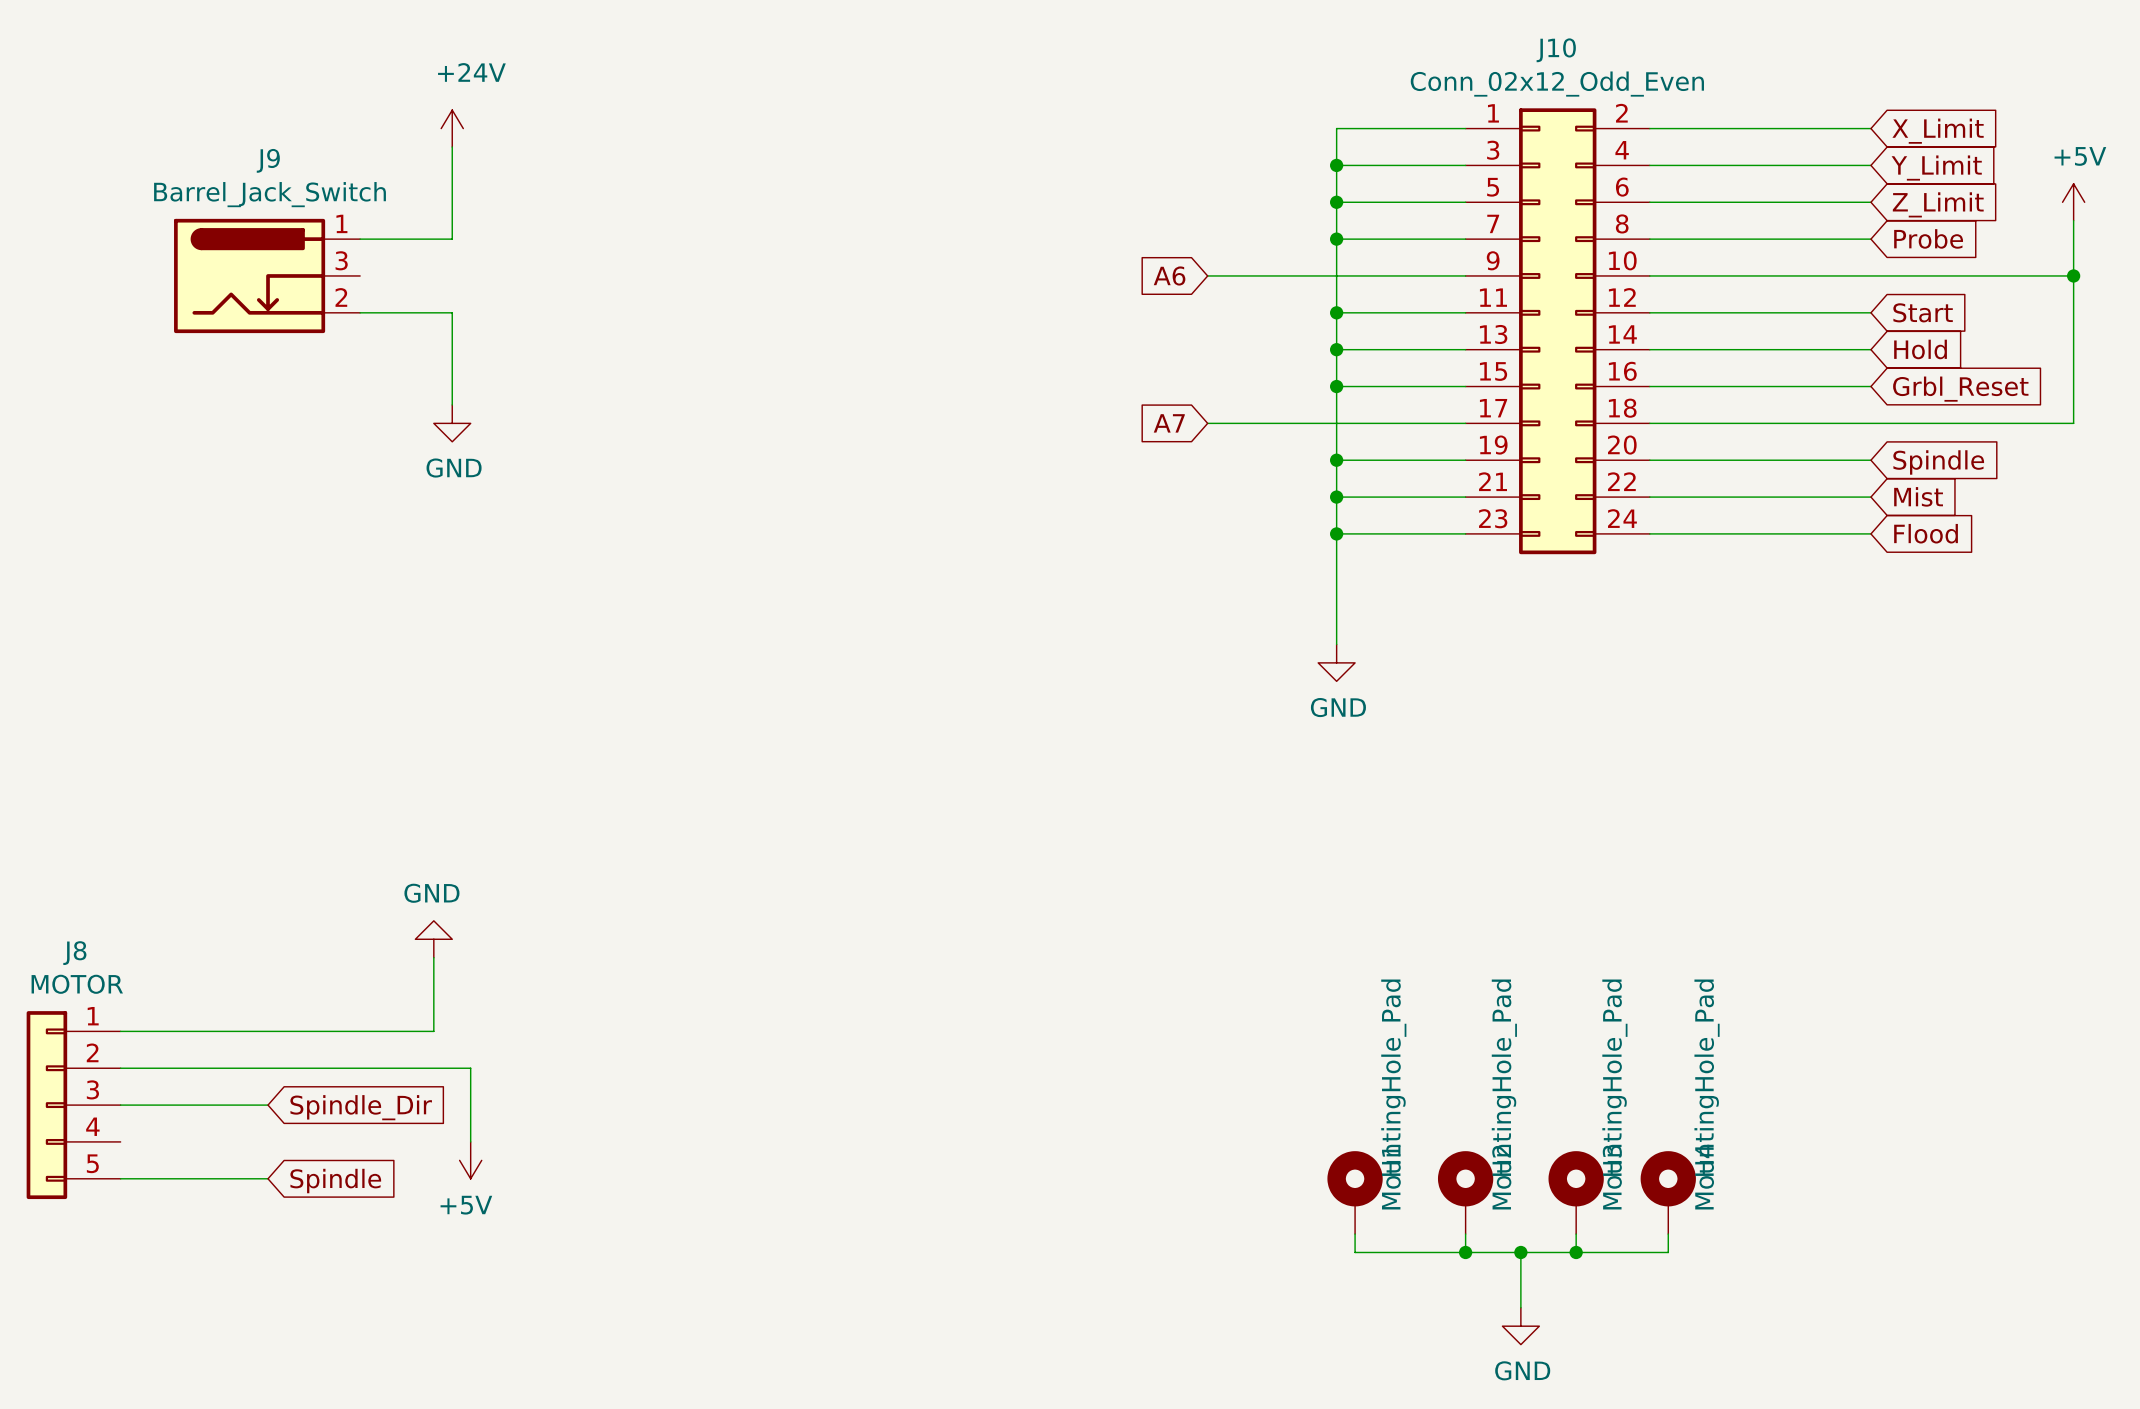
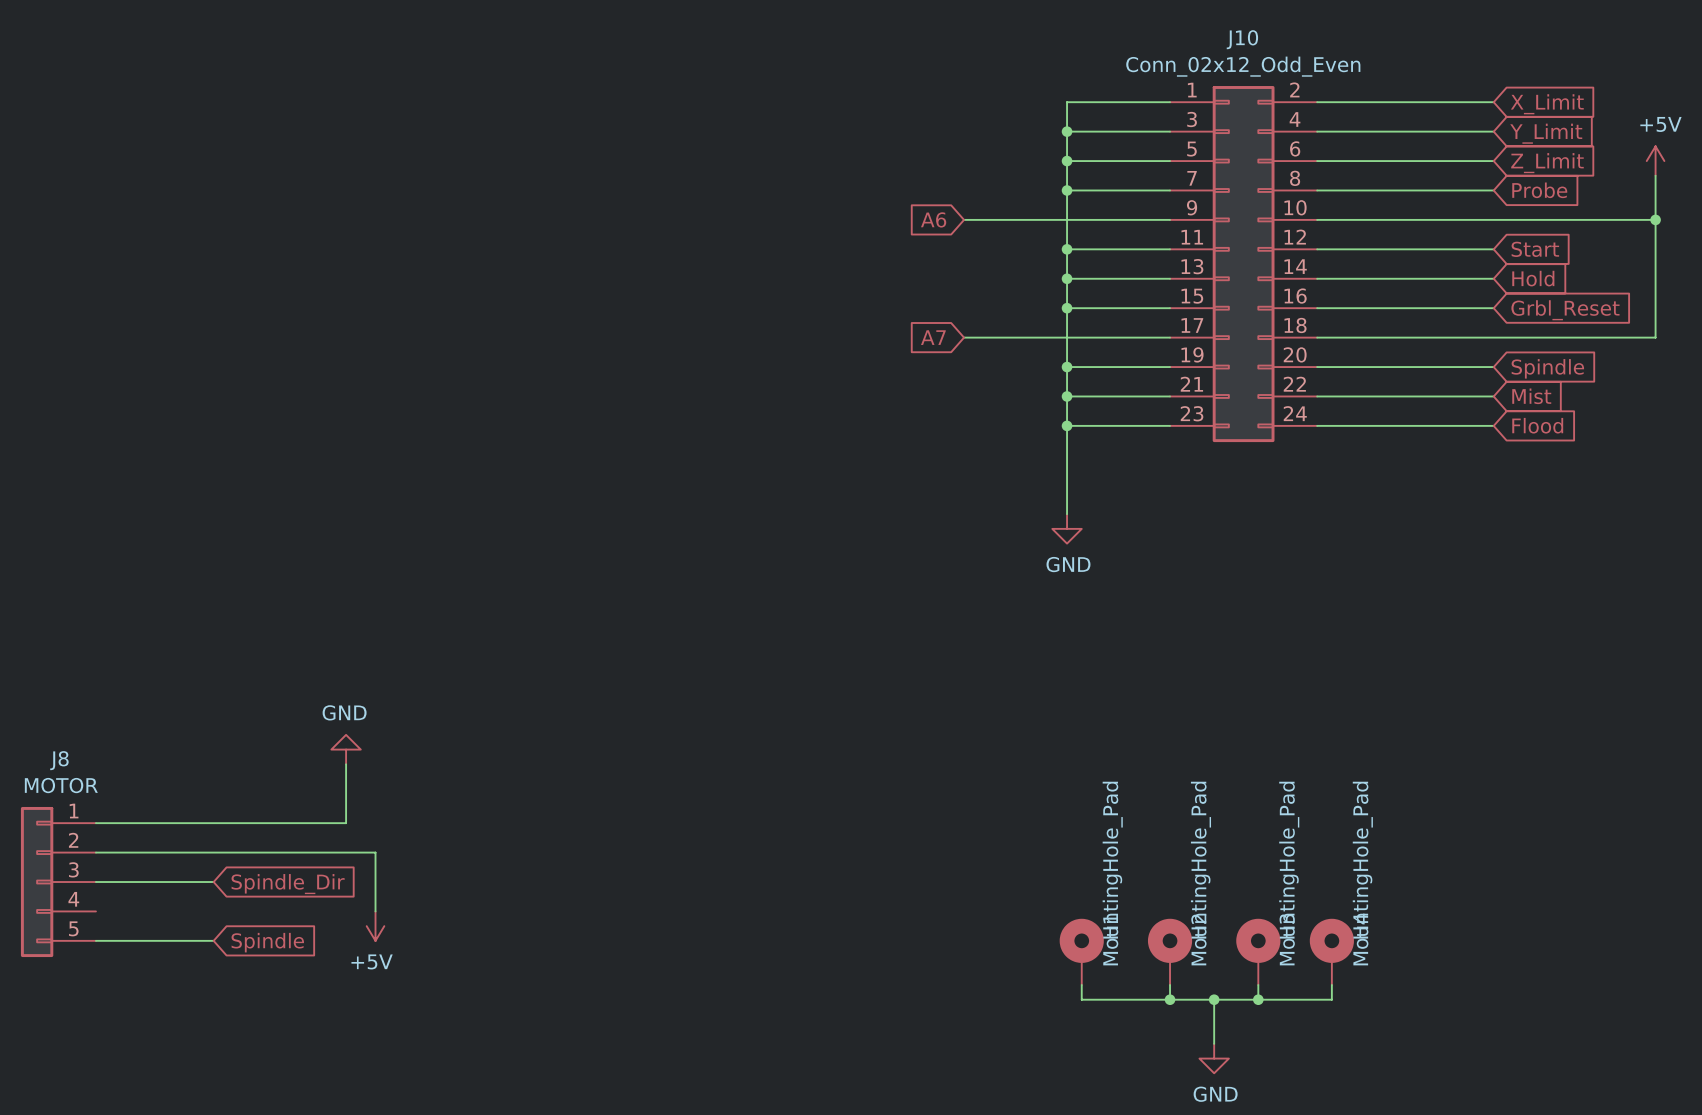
power symbol: +24V (452, 128) -> none
wire: (452, 147) (452, 239) (360, 239) -> none
J9: Barrel_Jack_Switch (267, 275) -> none
wire: (360, 312) (452, 312) (452, 404) -> none
power symbol: GND (452, 423) -> none

